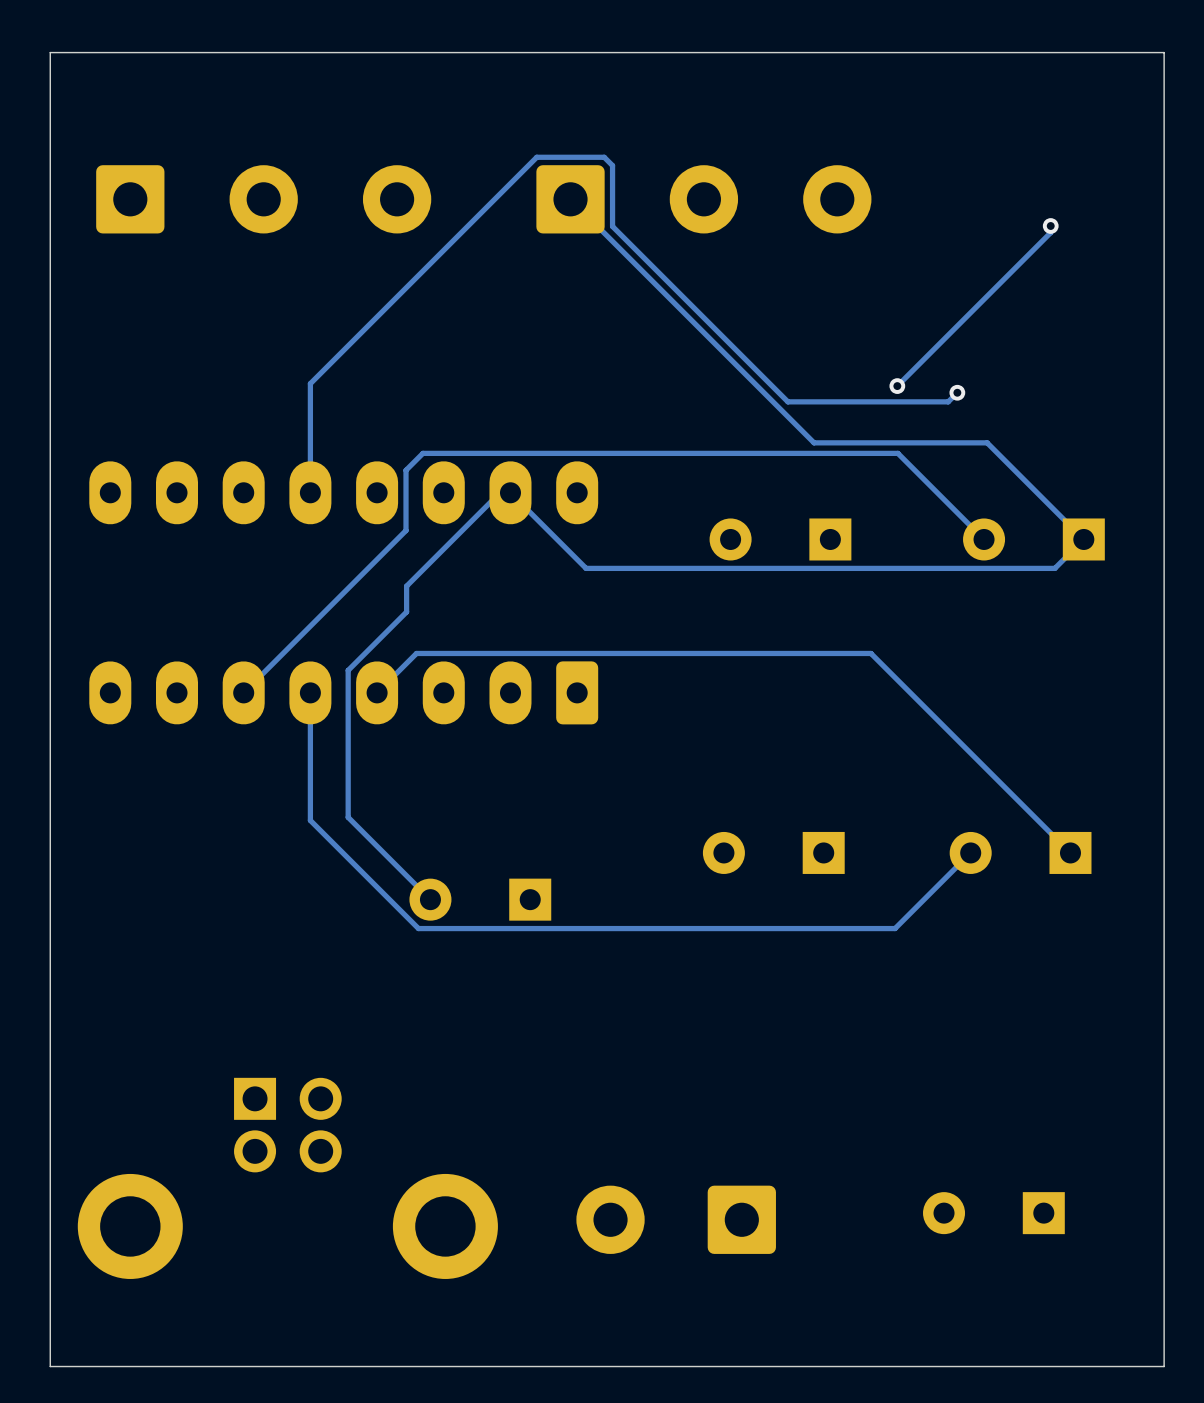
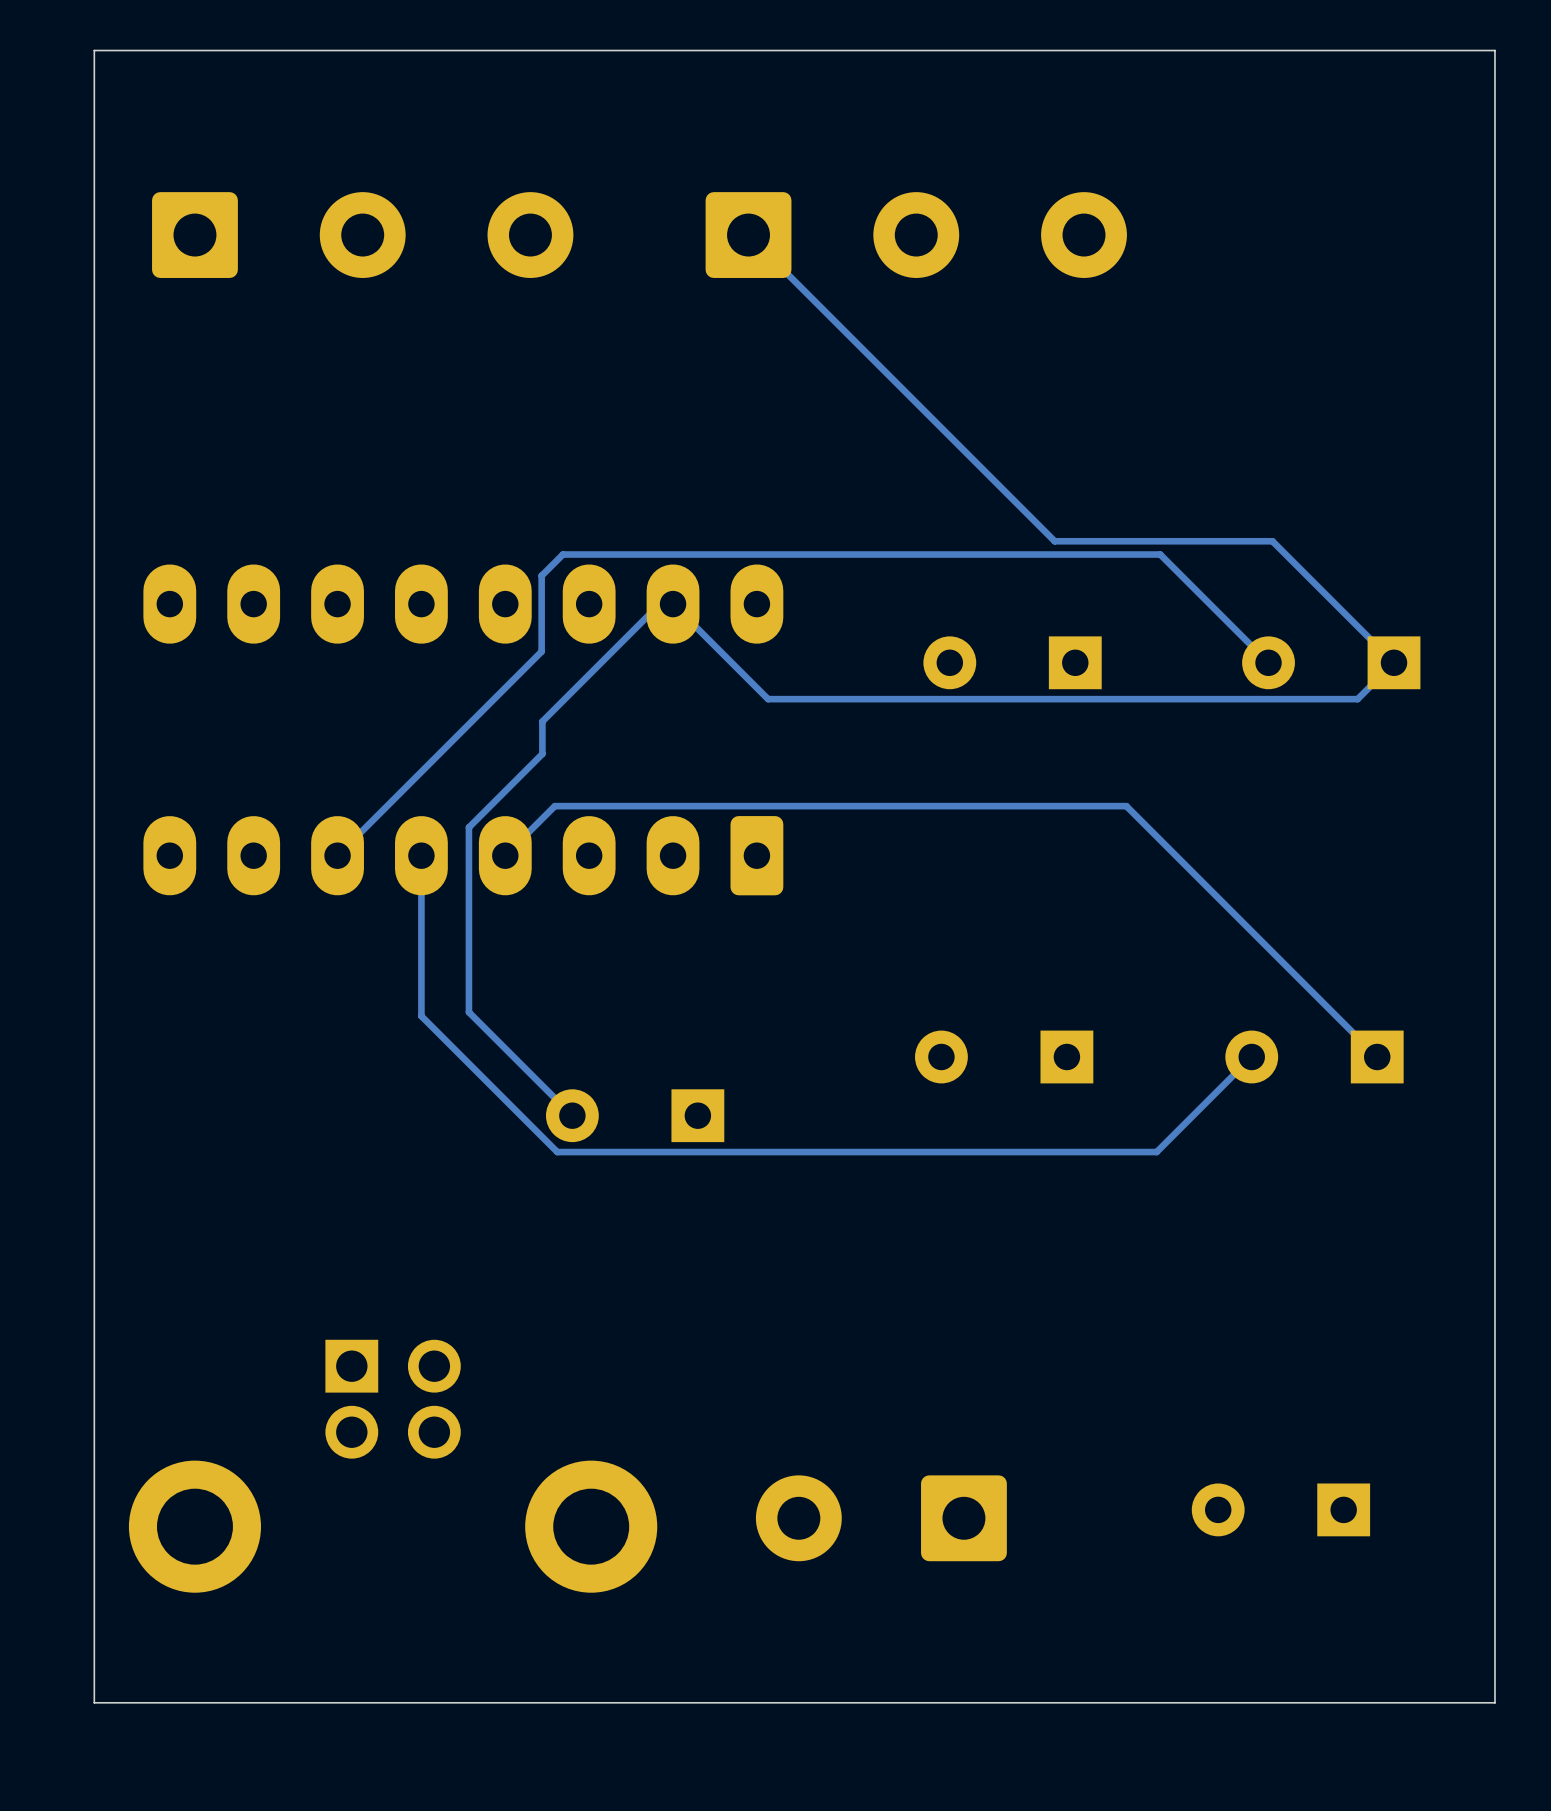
track: (1050, 226) (1050, 232) (897, 386) -> none
via: (1050, 226) -> none
via: (897, 386) -> none
track: (957, 392) (948, 401) (787, 401) (612, 226) (612, 165) (604, 157) (536, 157) (310, 383) (310, 492) -> none
via: (957, 392) -> none

